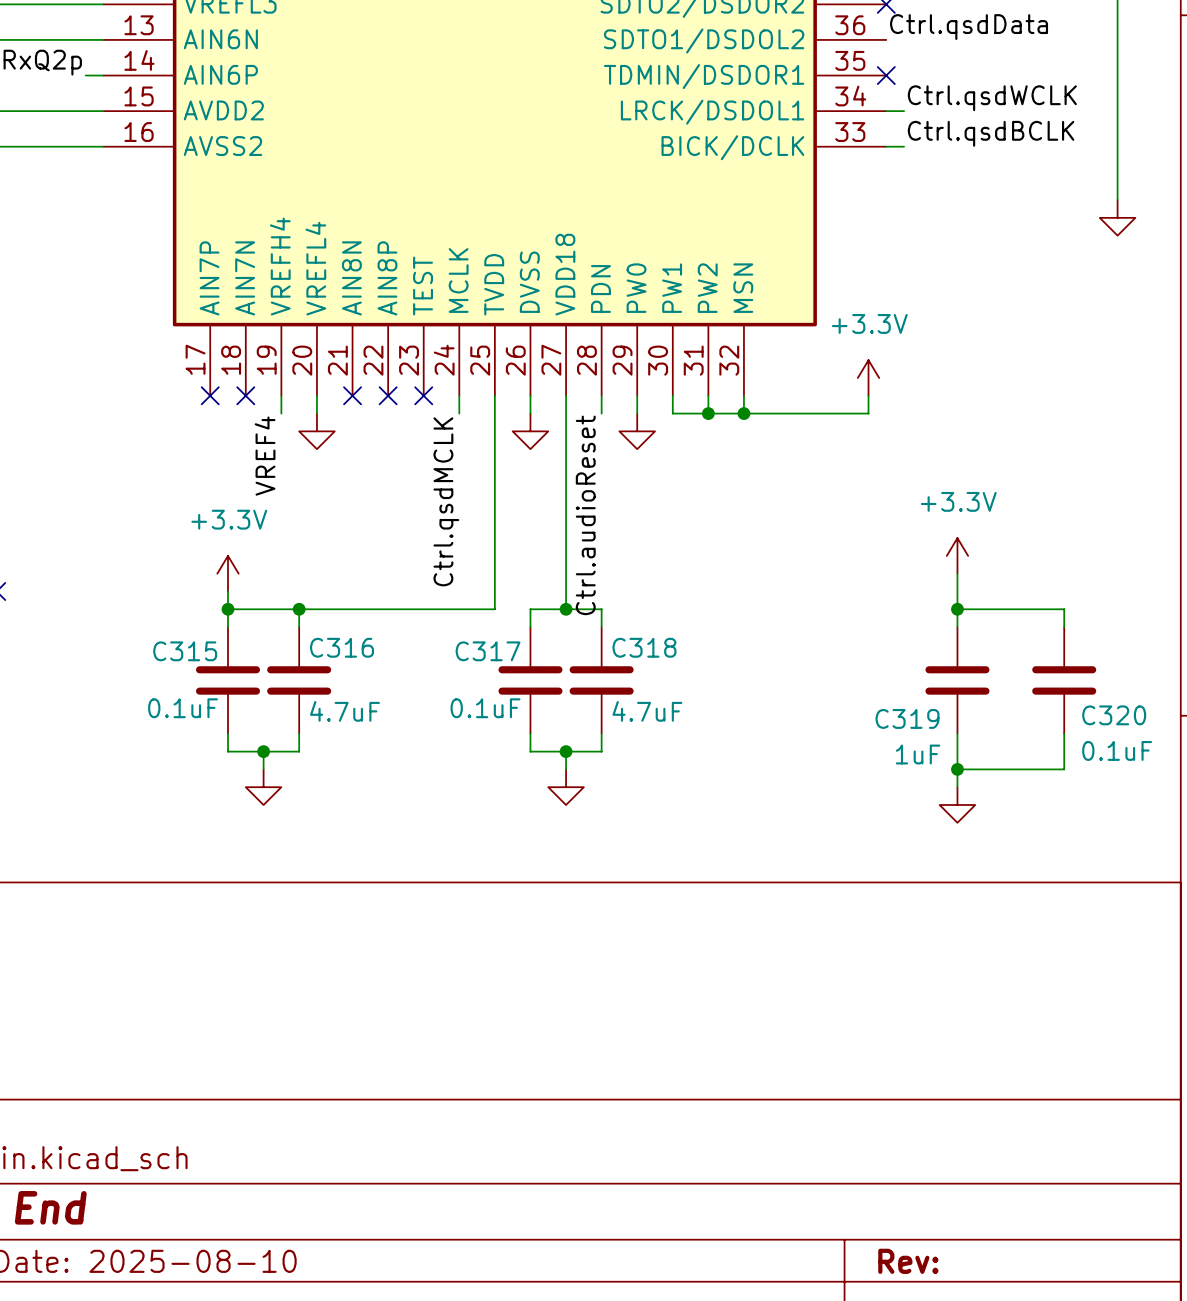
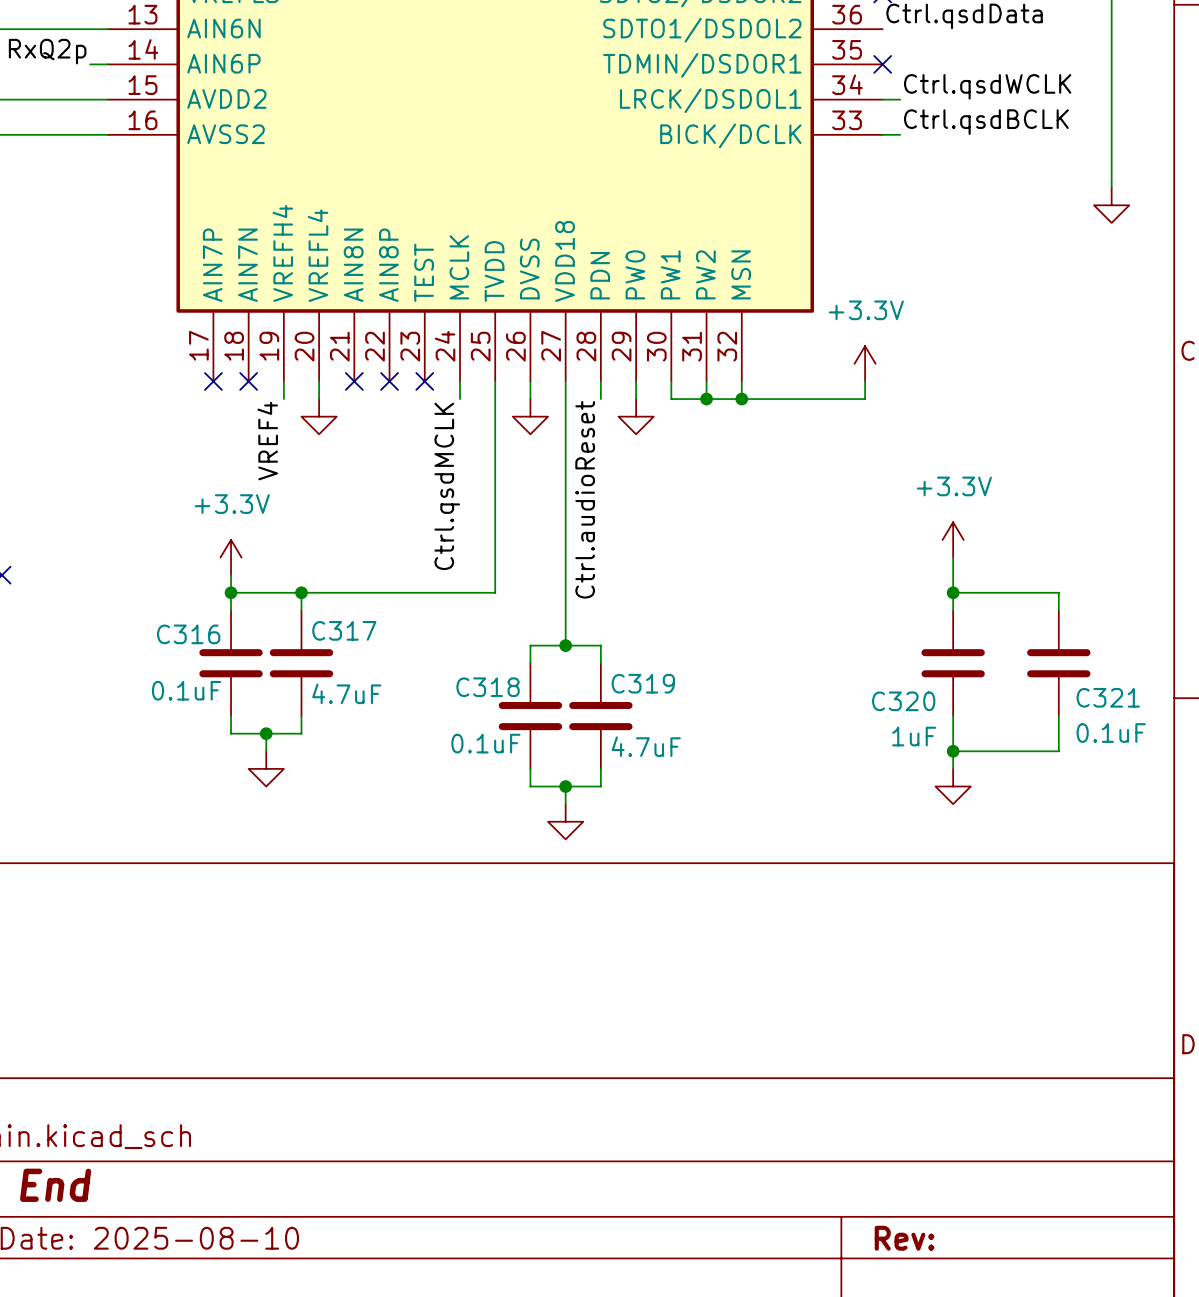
wire: none -> (565, 592) (565, 645)
junction: (566, 609) -> none
wire: (530, 627) (530, 609) (601, 609) (601, 627) -> (530, 663) (530, 645) (600, 645) (600, 663)
C316 name: C316 (342, 647) -> C317 (344, 630)
C318 name position: C318 (644, 647) -> C318 (488, 687)
C315 name: C315 (185, 651) -> C316 (188, 634)
junction: none -> (565, 645)
C317: 0.1uF (530, 680) -> none
C318 position: (601, 680) -> (530, 716)
C318 value: 4.7uF (647, 711) -> 0.1uF (485, 743)
C320 name: C320 (1114, 715) -> C321 (1108, 697)
C319 name: C319 (907, 718) -> C320 (903, 701)
wire: (530, 733) (530, 751) (601, 751) (601, 733) -> (530, 768) (530, 786) (600, 786) (600, 768)
C319: none -> 4.7uF (600, 716)
wire: (566, 751) (566, 769) -> (565, 786) (565, 804)
junction: (566, 751) -> none
power symbol position: (566, 787) -> (565, 821)
junction: none -> (565, 786)

